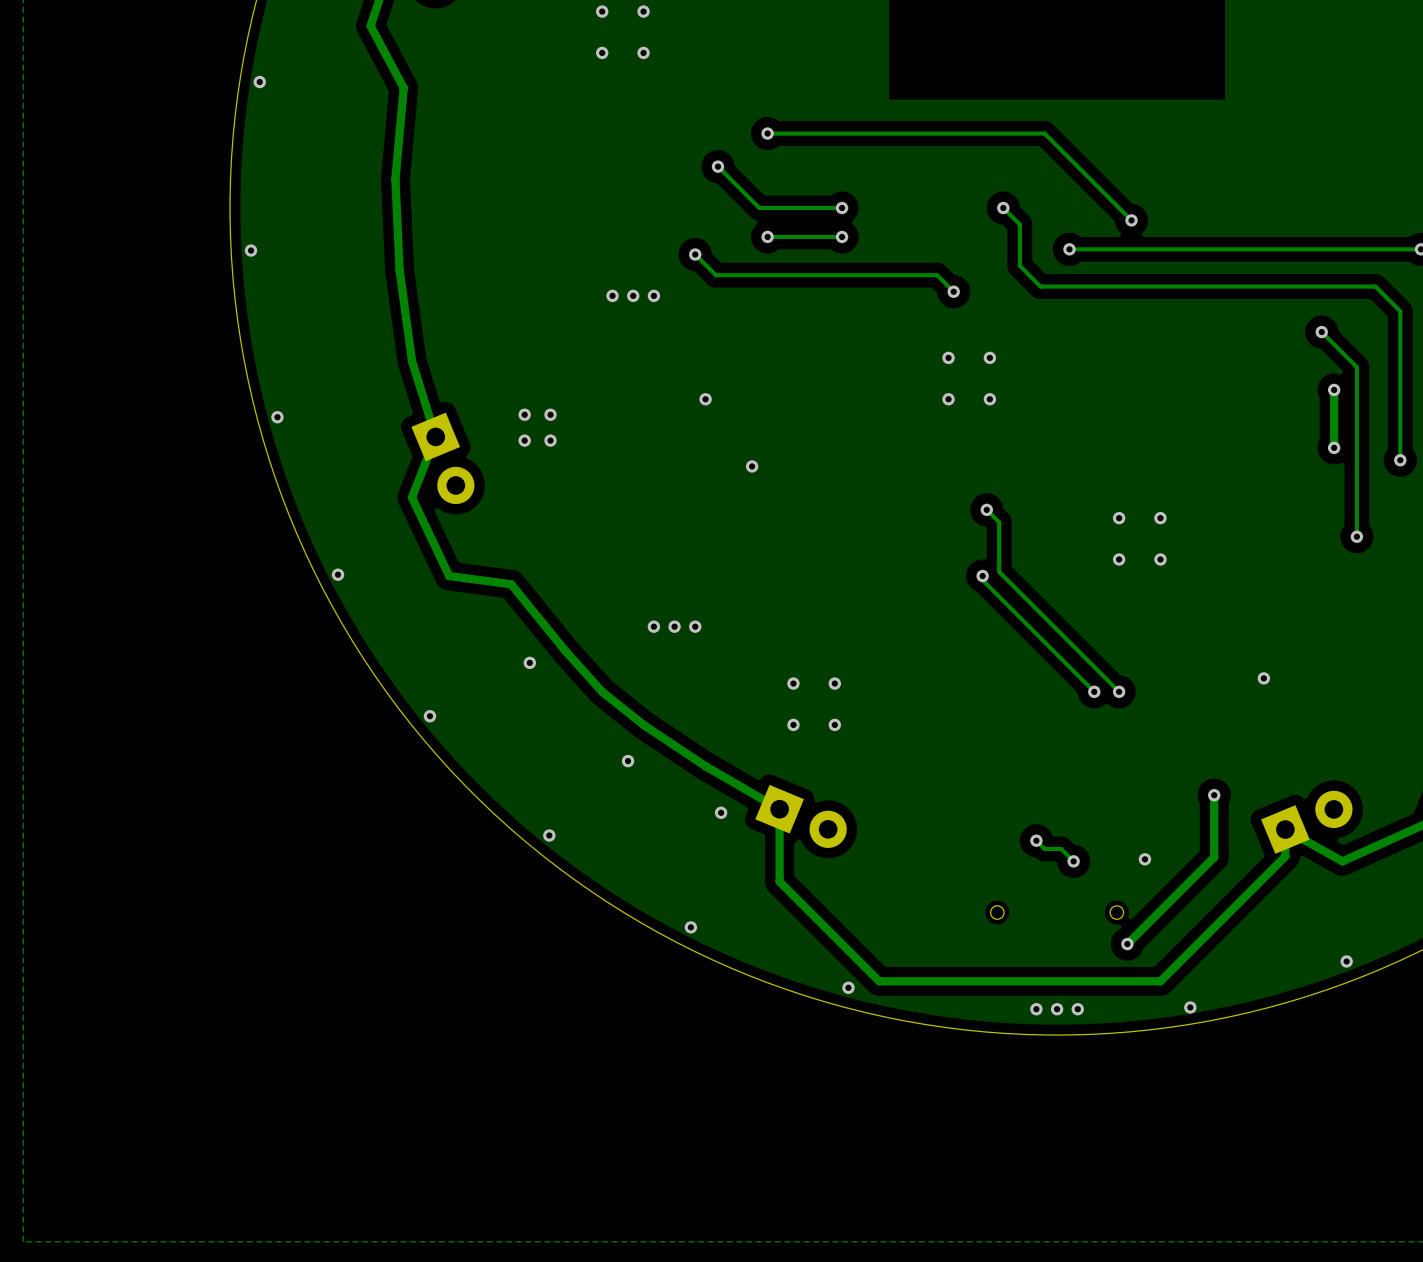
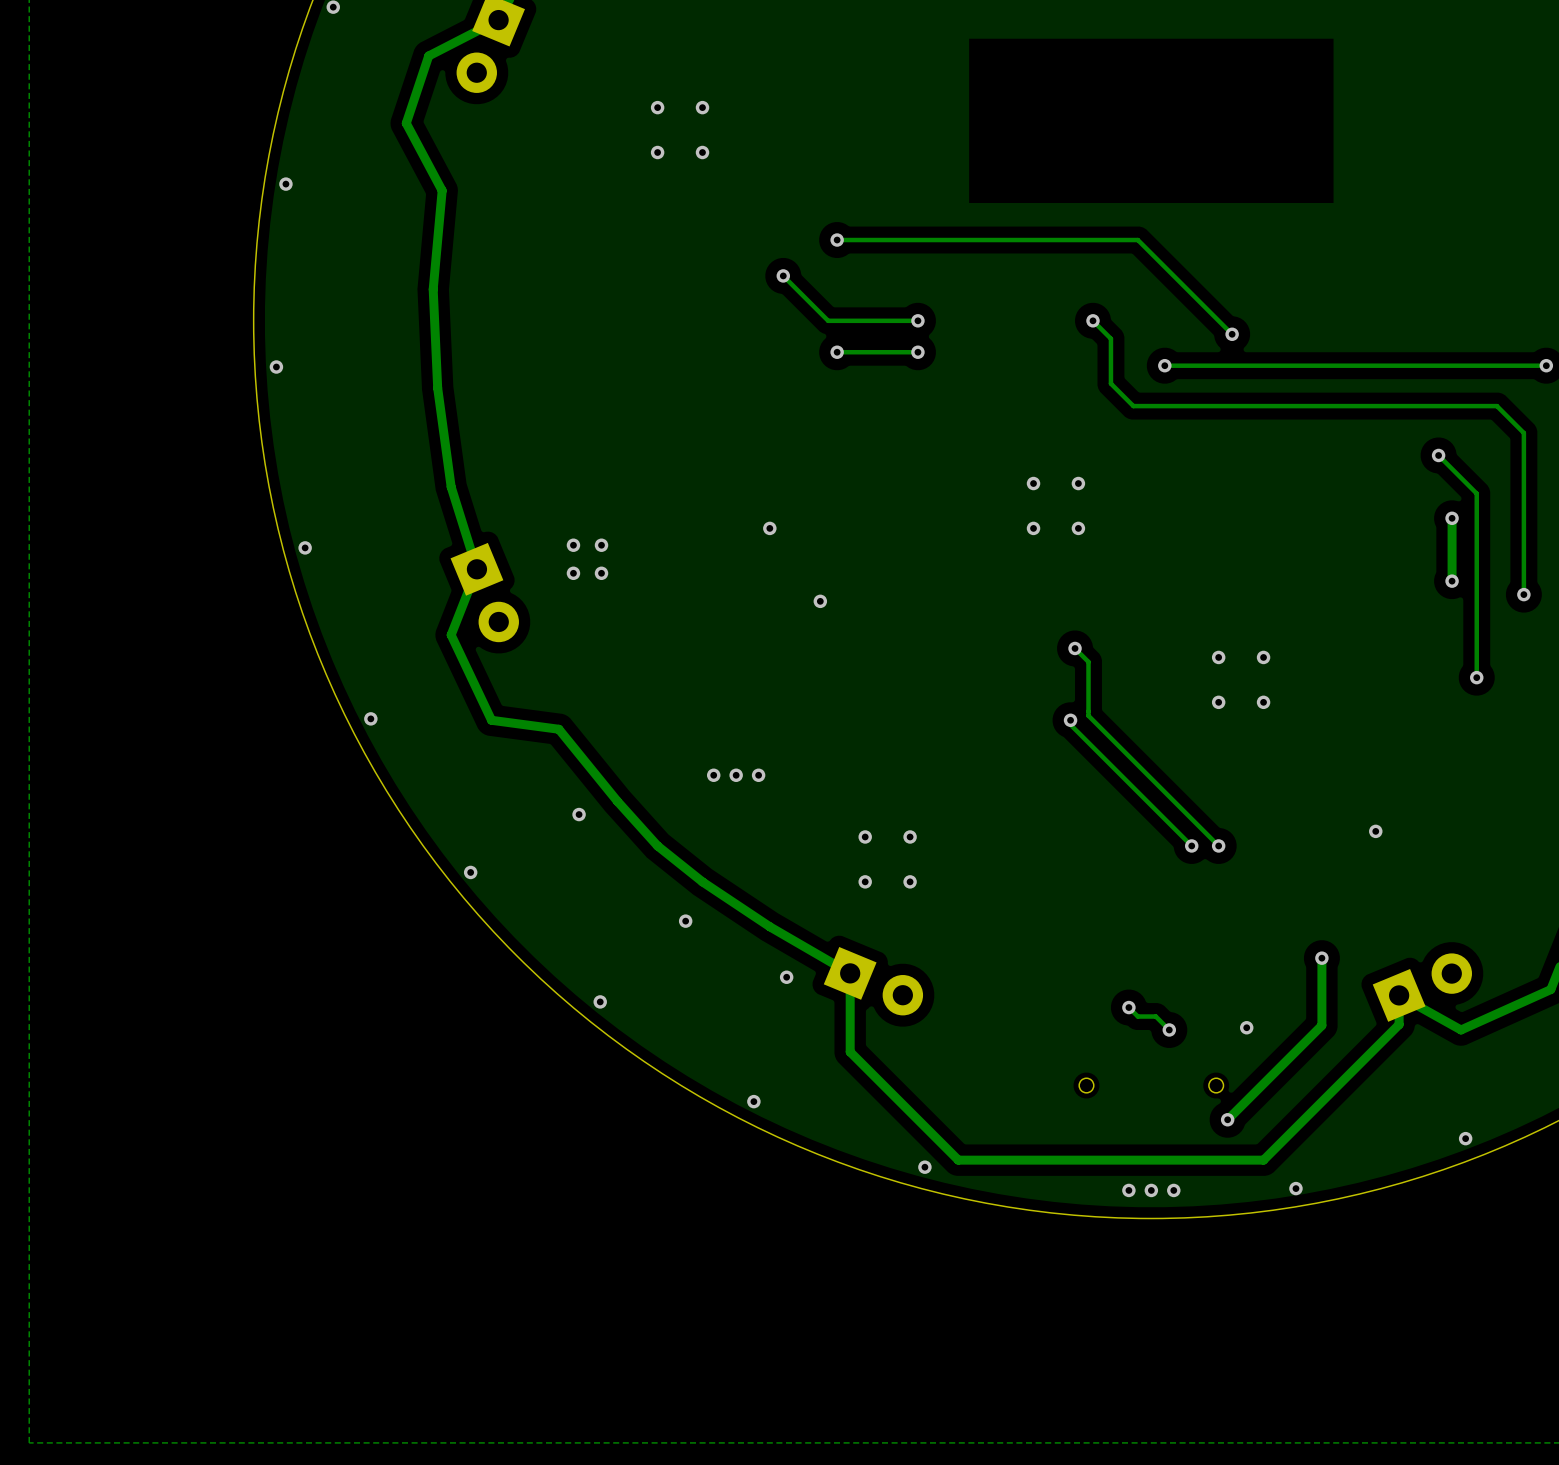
track: (695, 254) (715, 275) (937, 275) (953, 291) -> none
via: (695, 254) -> none
via: (953, 291) -> none
via: (612, 295) -> none
via: (633, 295) -> none
via: (653, 295) -> none

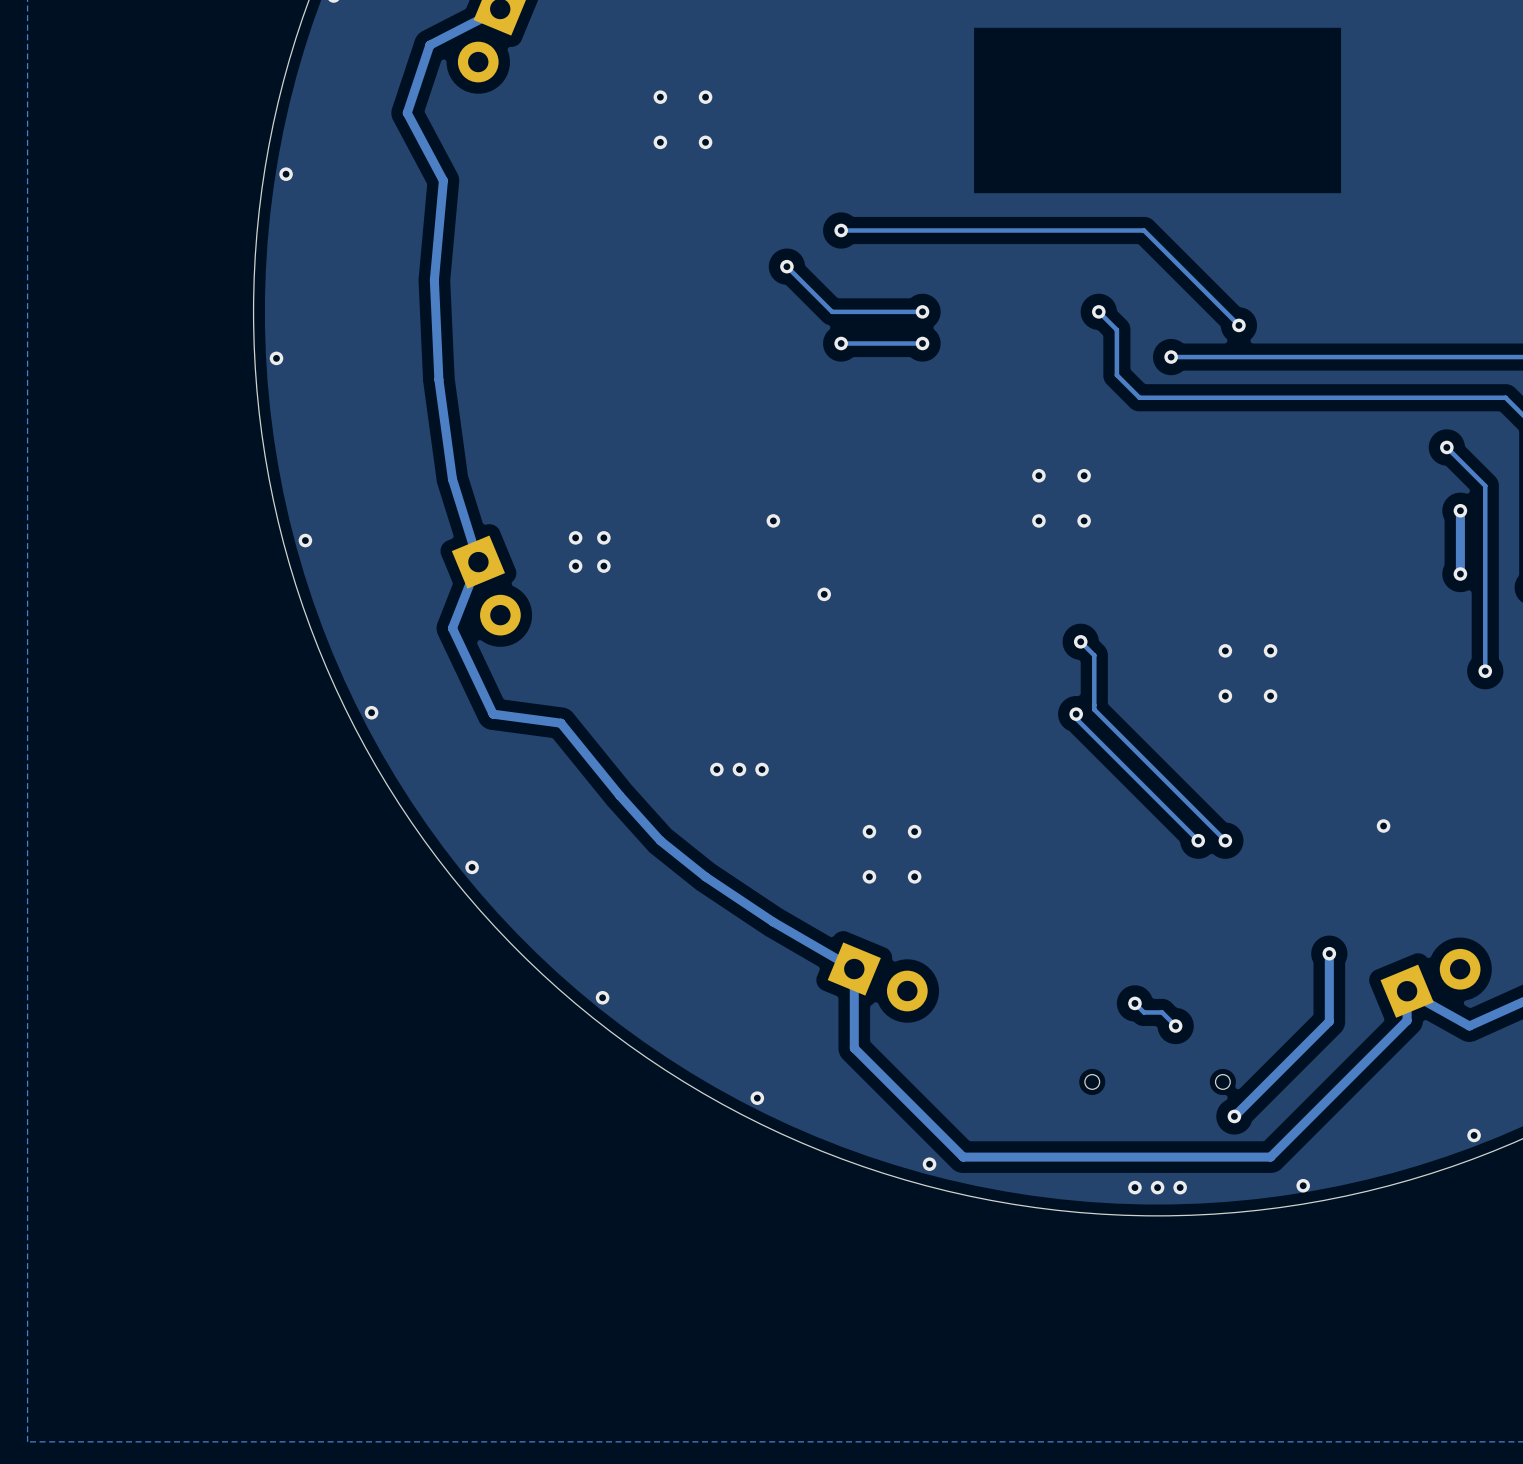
via: (579, 814) -> none
via: (685, 921) -> none
via: (786, 977) -> none
via: (1246, 1027) -> none

